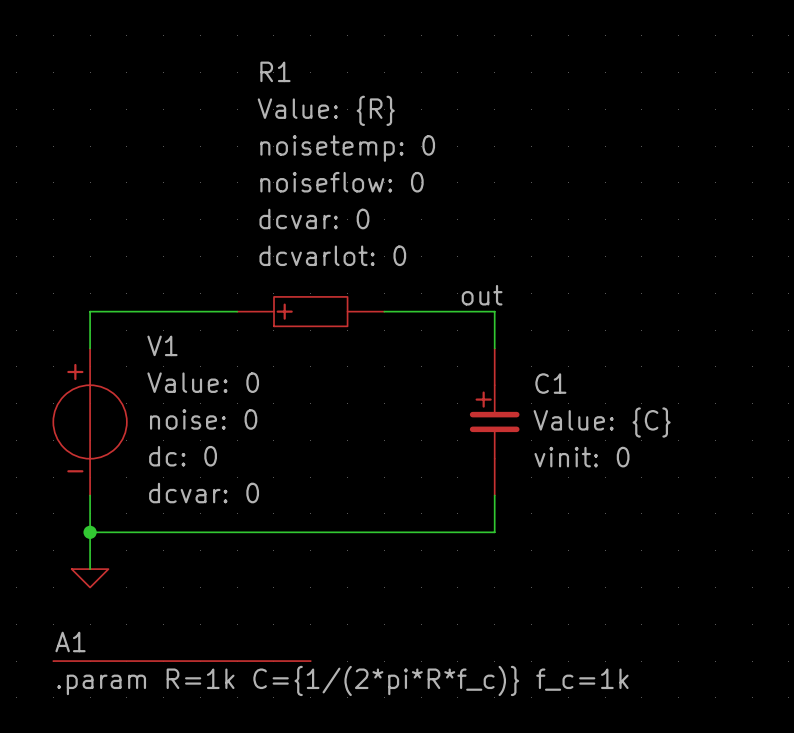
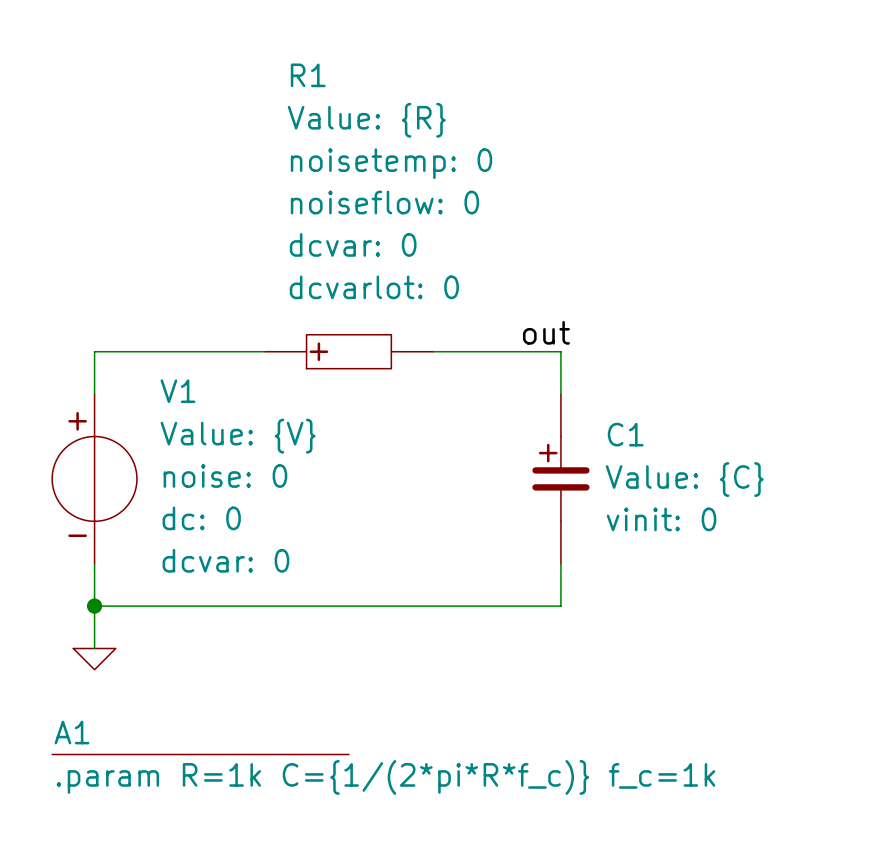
V1 value: Value: 0 (203, 382) -> Value: {V} (238, 436)

